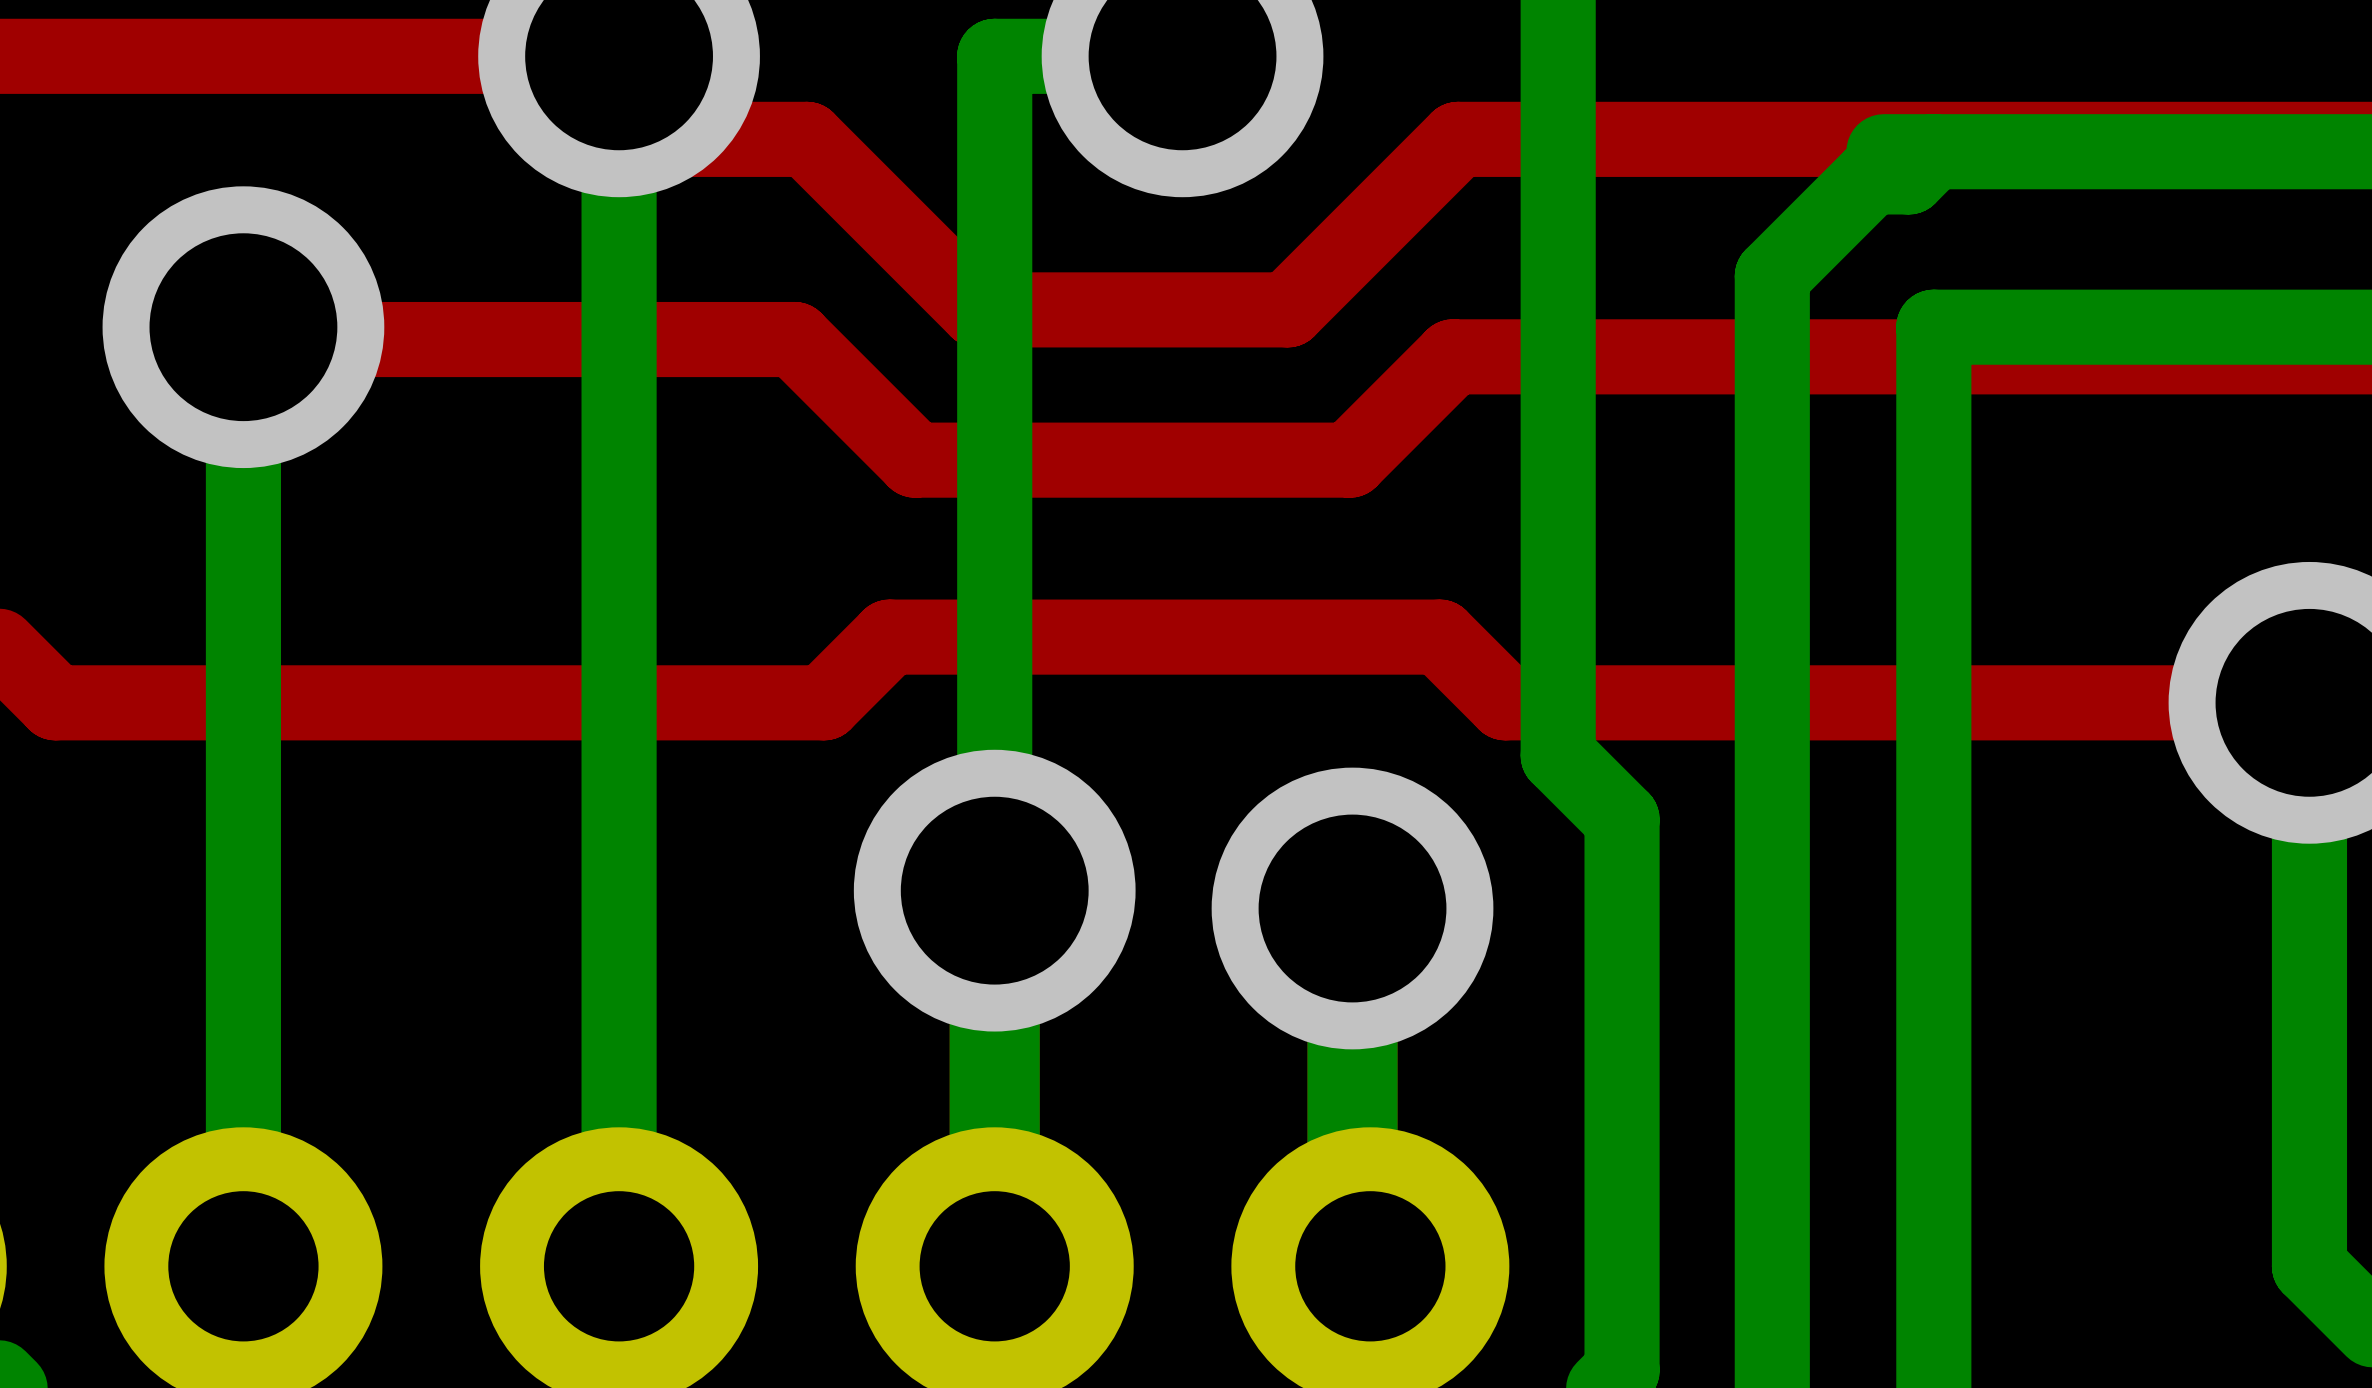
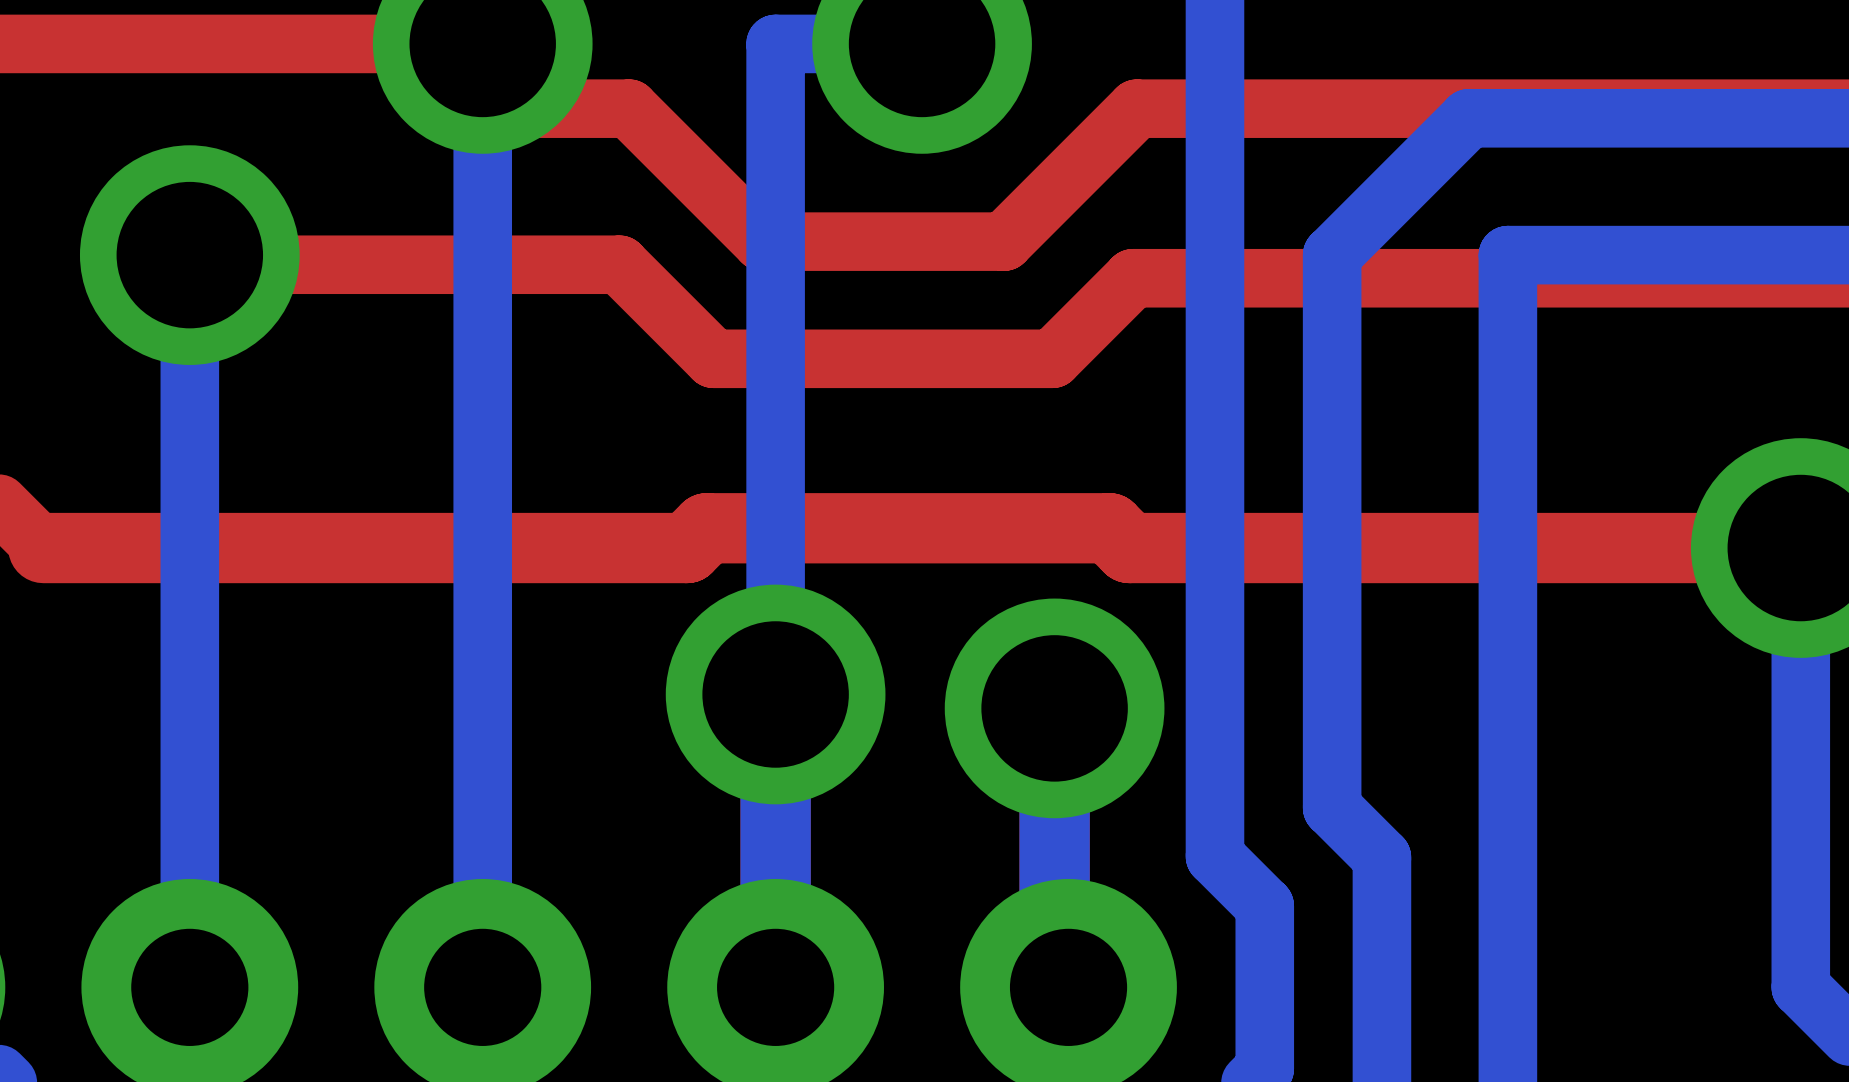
bottom track: (1933, 151) (1908, 176) (1871, 176) (1772, 276) (1772, 1099) -> (1468, 118) (1332, 255) (1332, 807) (1381, 857)
top track width: thin (823, 702) (55, 702) -> thick (642, 548) (43, 548)
top track: (1505, 702) (1439, 637) (889, 637) (823, 702) -> (1173, 548) (1129, 548) (1109, 528) (706, 528) (687, 548) (642, 548)
top track width: thin (2309, 702) (1505, 702) -> thick (1800, 548) (1173, 548)
bottom track: (1558, 755) (1622, 819) (1622, 1162) -> (1214, 589) (1214, 856) (1264, 906)

